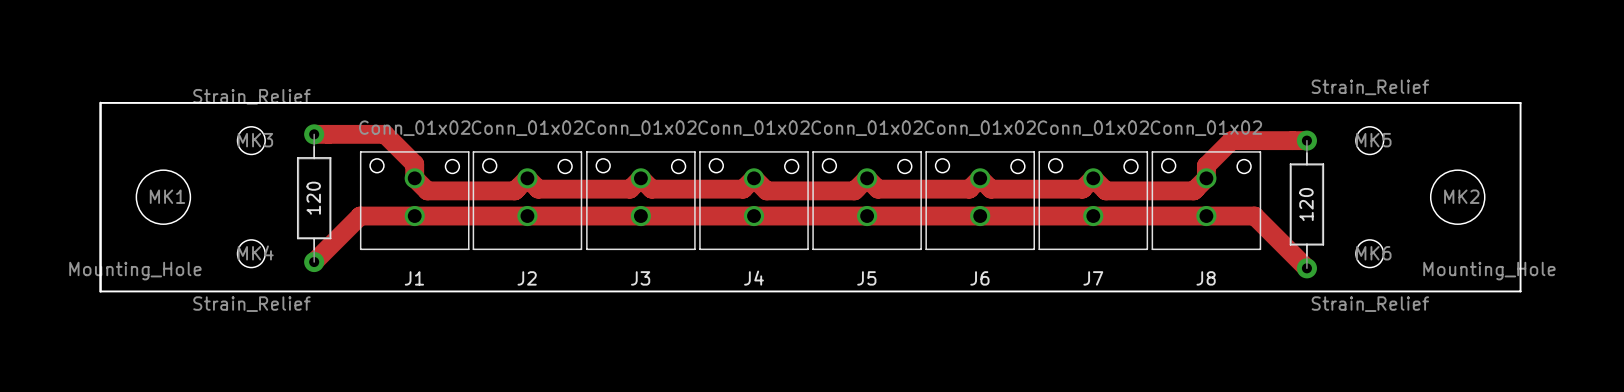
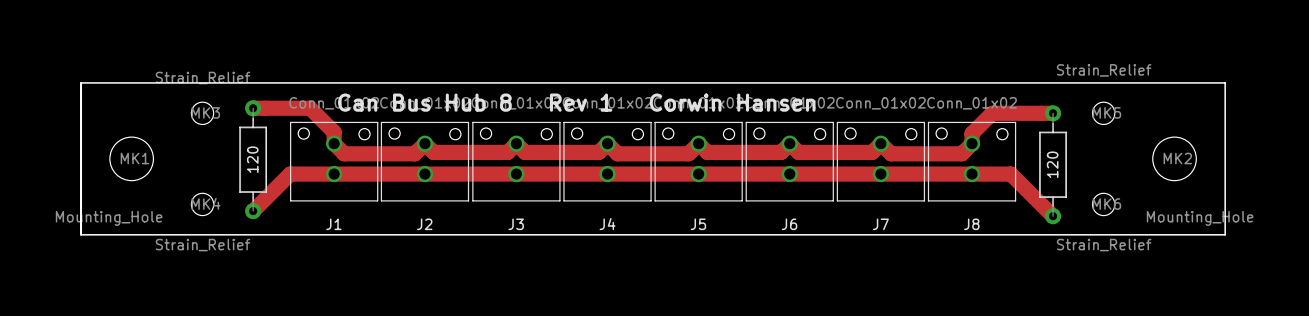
text: none -> Can Bus Hub 8 Rev 1 Corwin Hansen (576, 102)

